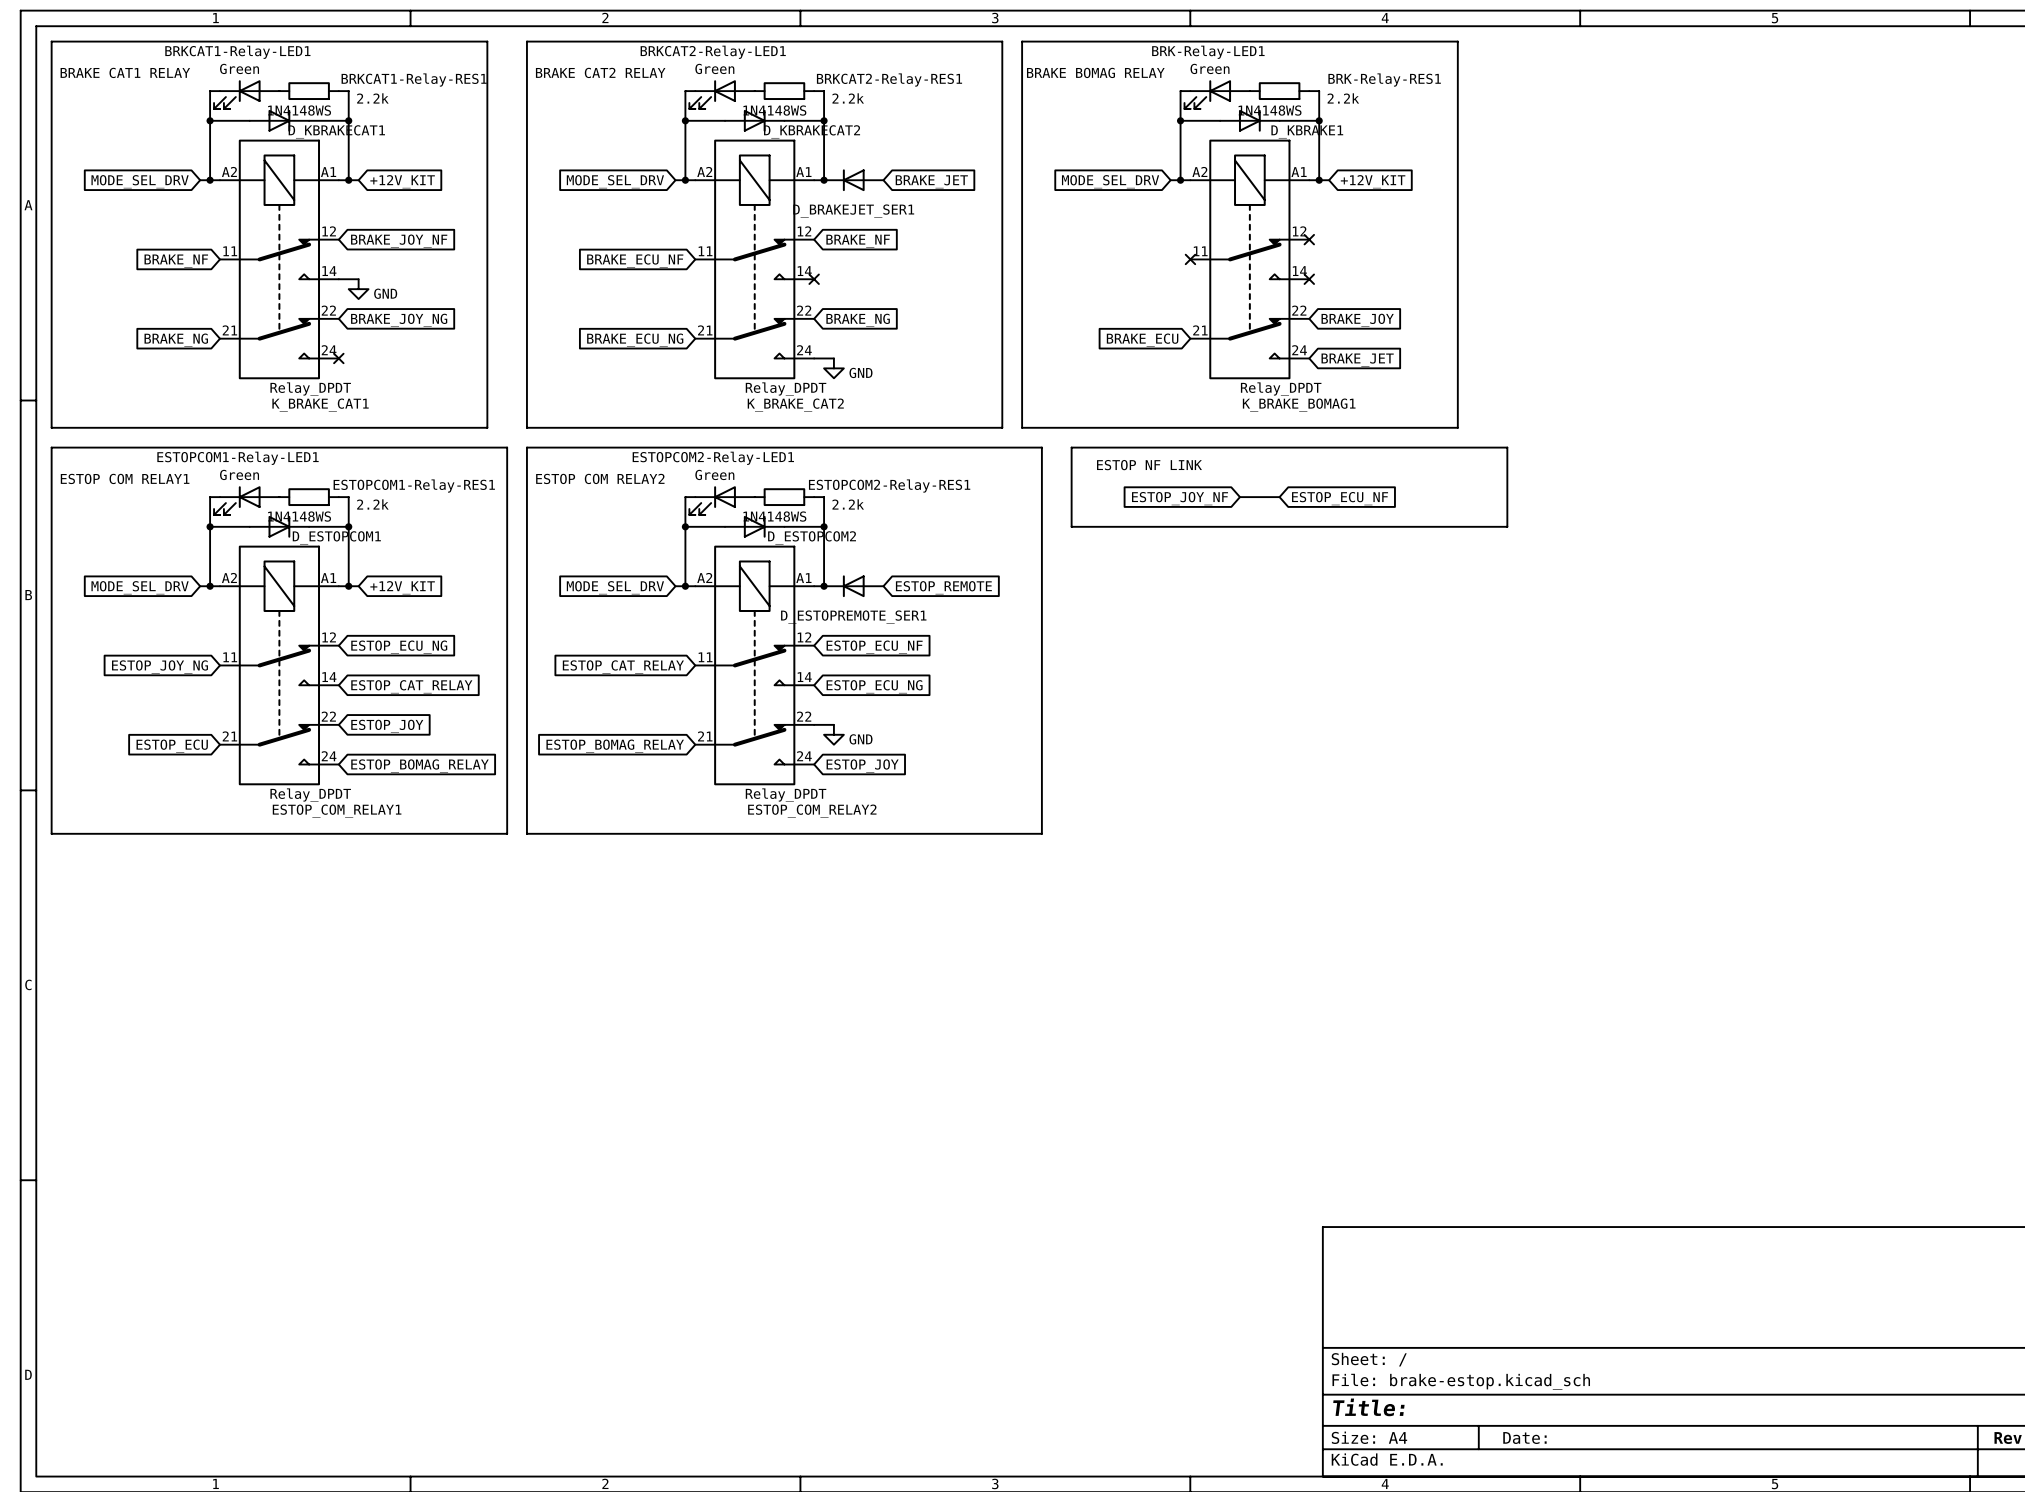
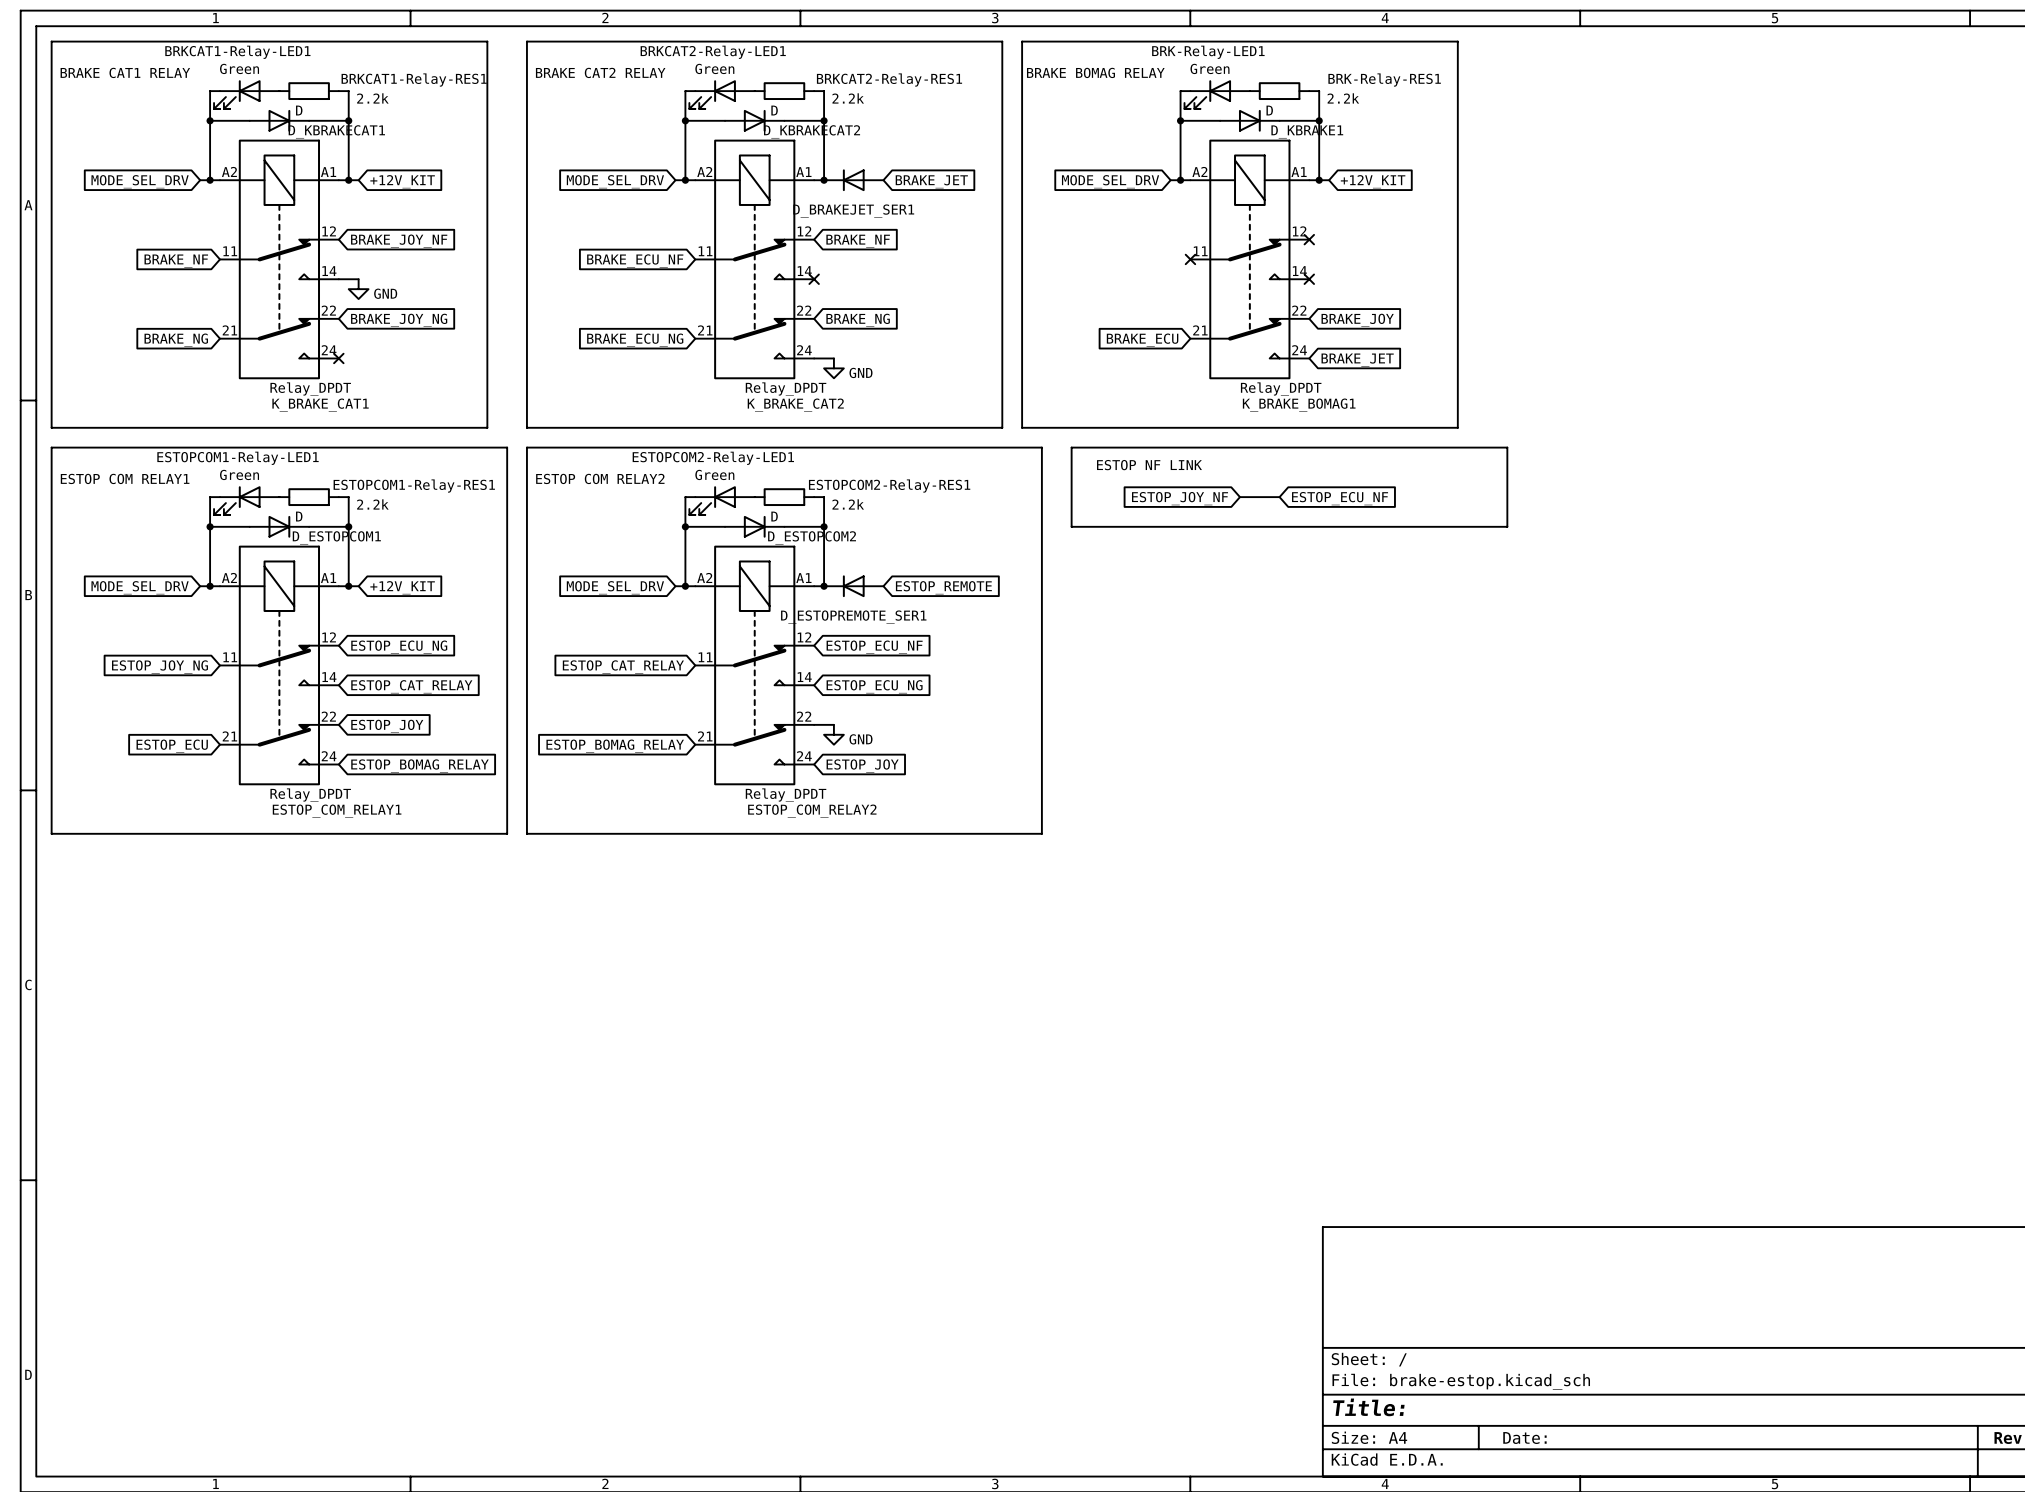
D_KBRAKECAT1 value: 1N4148WS (299, 110) -> D (299, 110)
D_KBRAKECAT2 value: 1N4148WS (774, 110) -> D (774, 110)
D_KBRAKE1 value: 1N4148WS (1270, 110) -> D (1269, 110)
D_ESTOPCOM1 value: 1N4148WS (299, 516) -> D (299, 516)
D_ESTOPCOM2 value: 1N4148WS (774, 516) -> D (774, 516)

